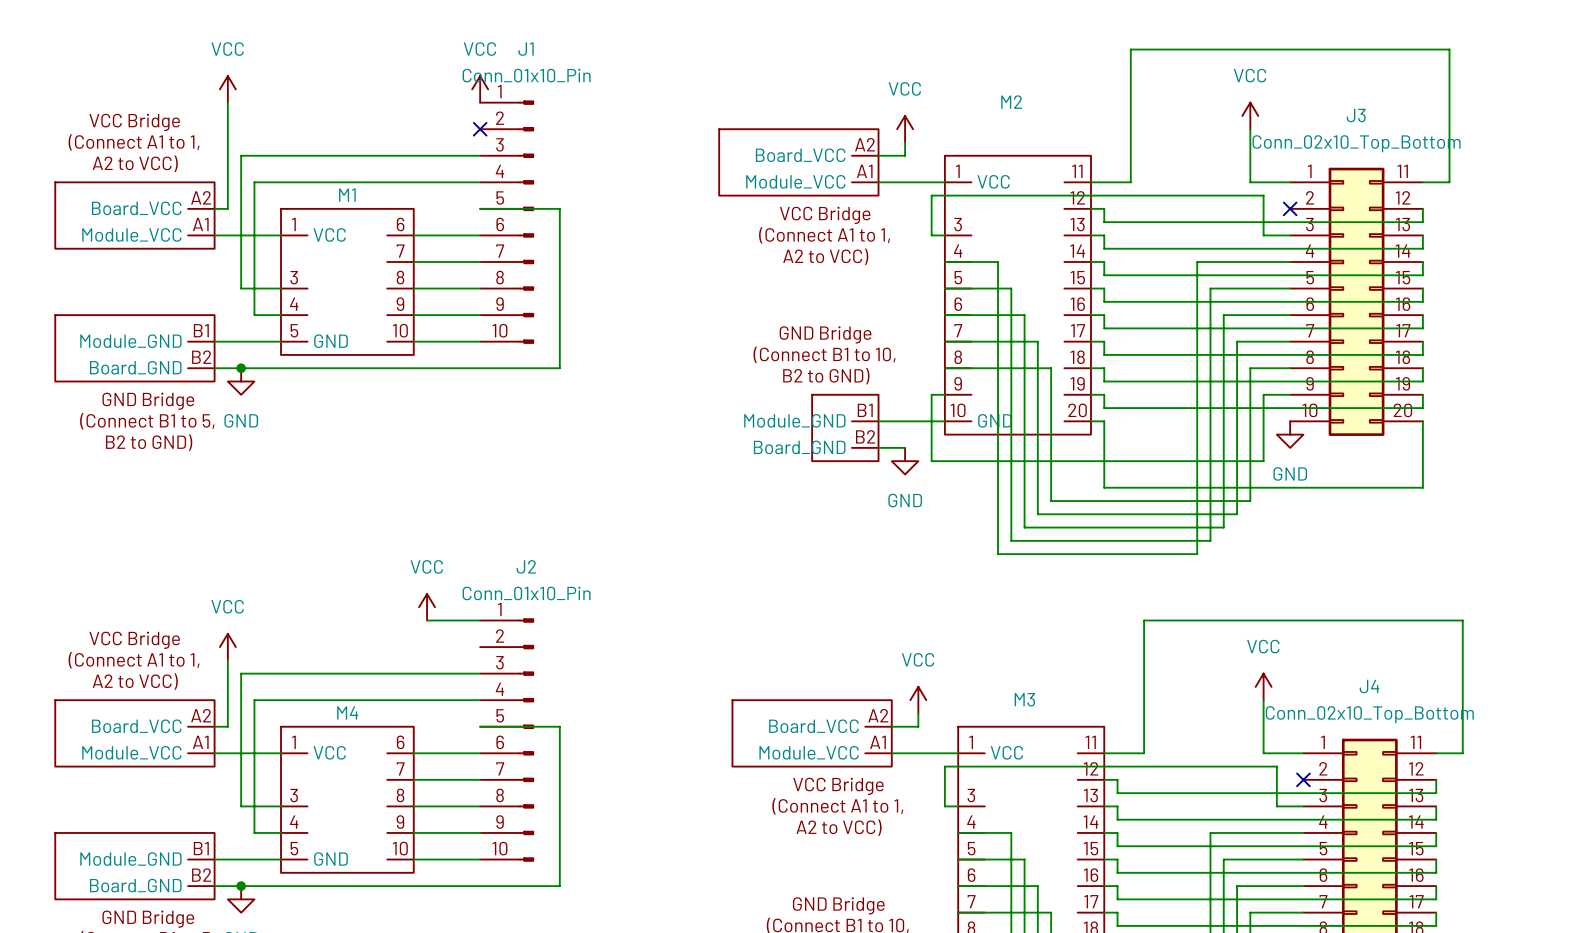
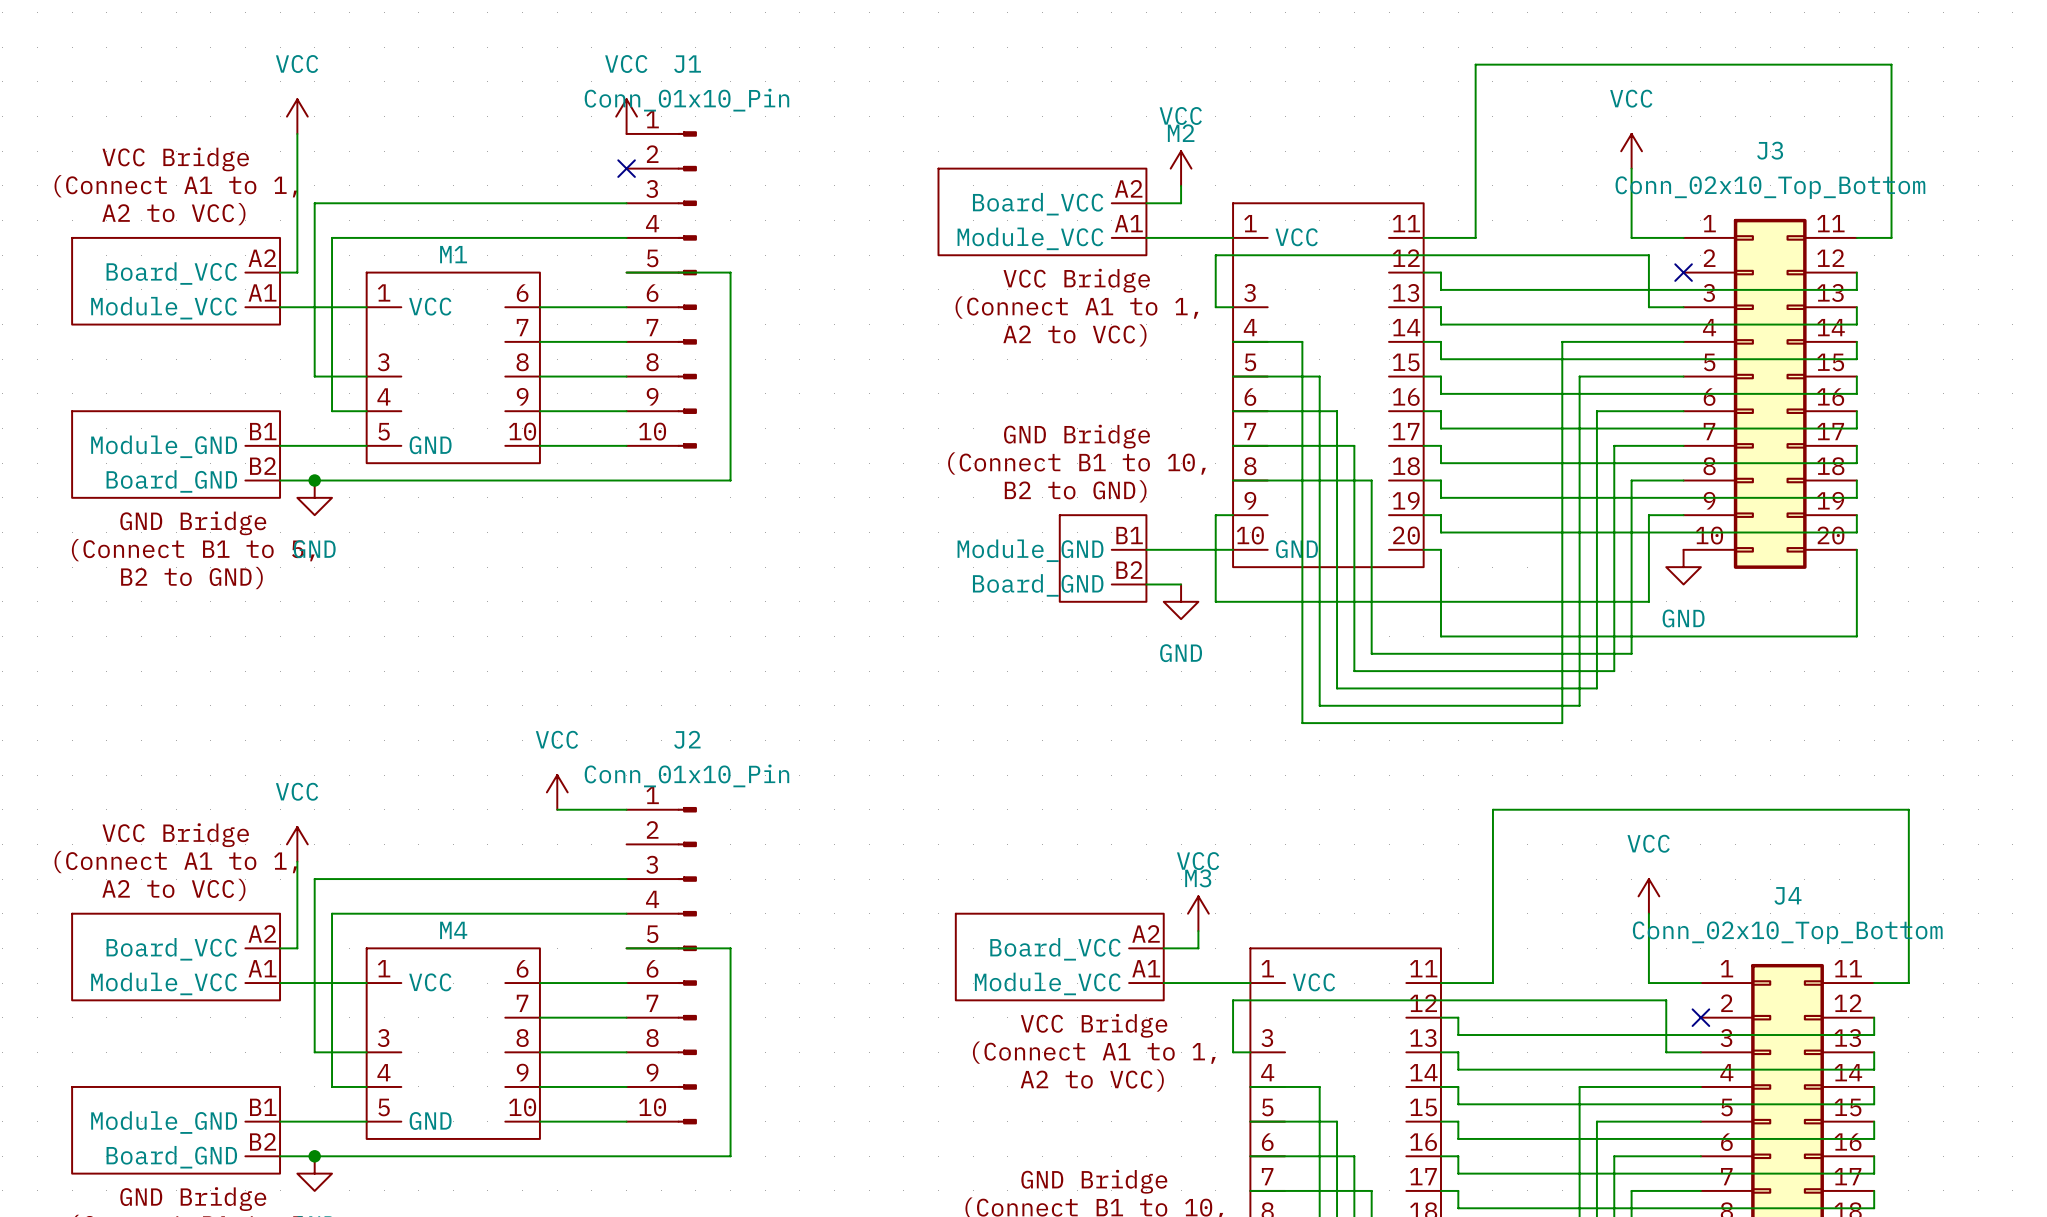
M2 name position: M2 (1011, 102) -> M2 (1181, 133)
M3 name position: M3 (1024, 699) -> M3 (1198, 878)

